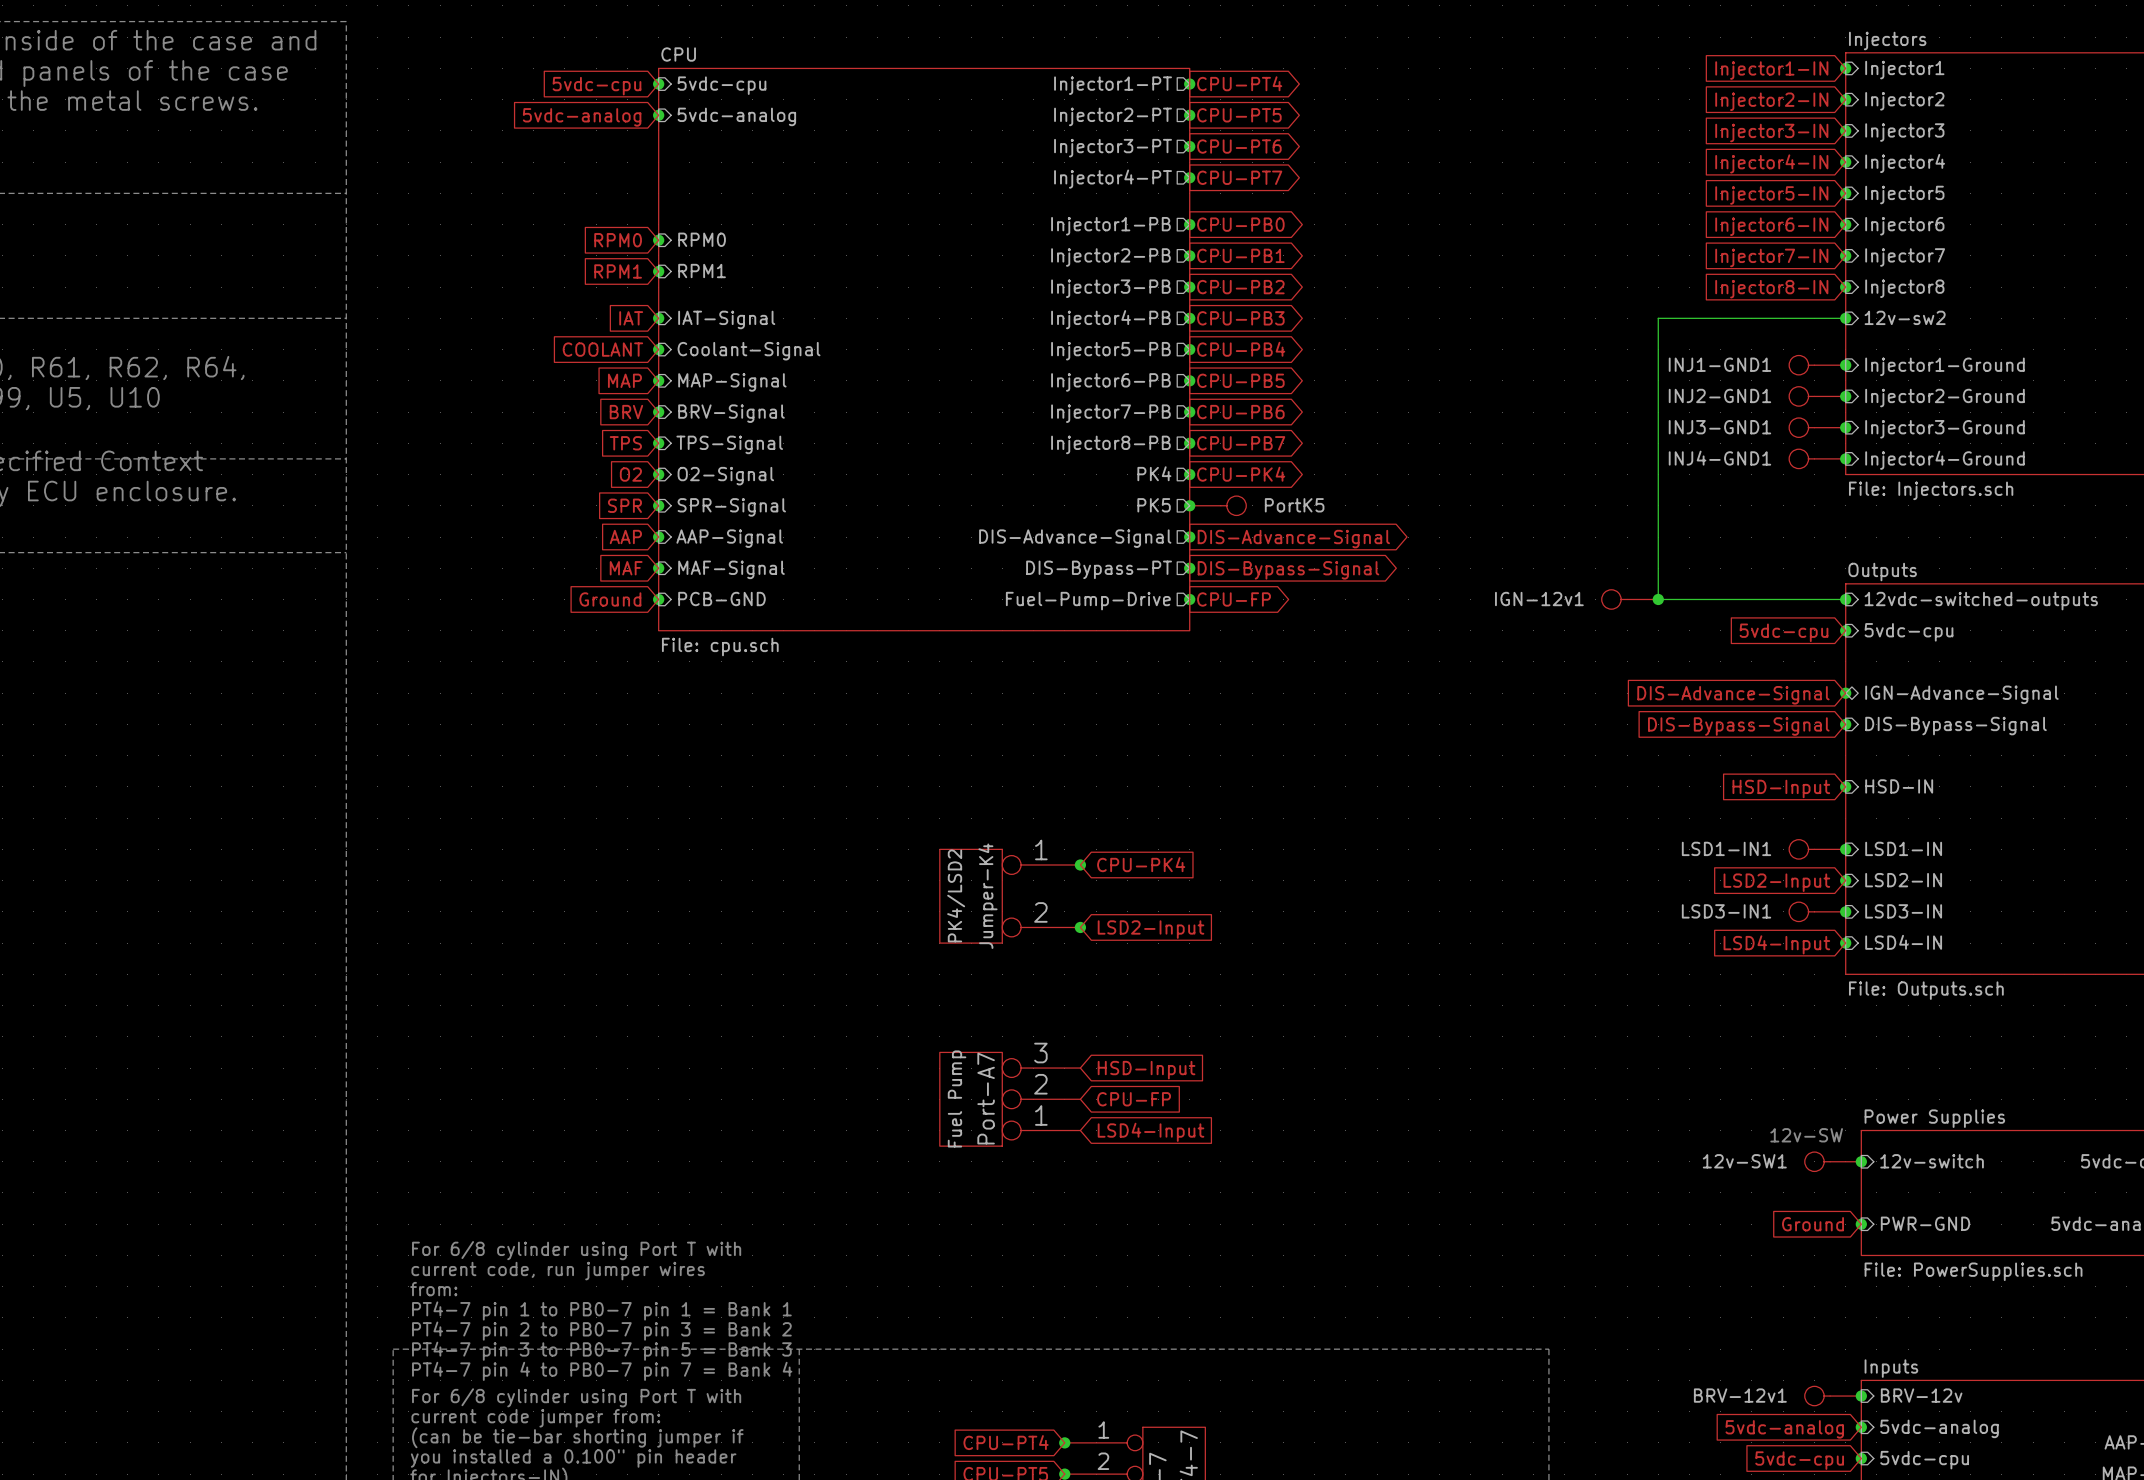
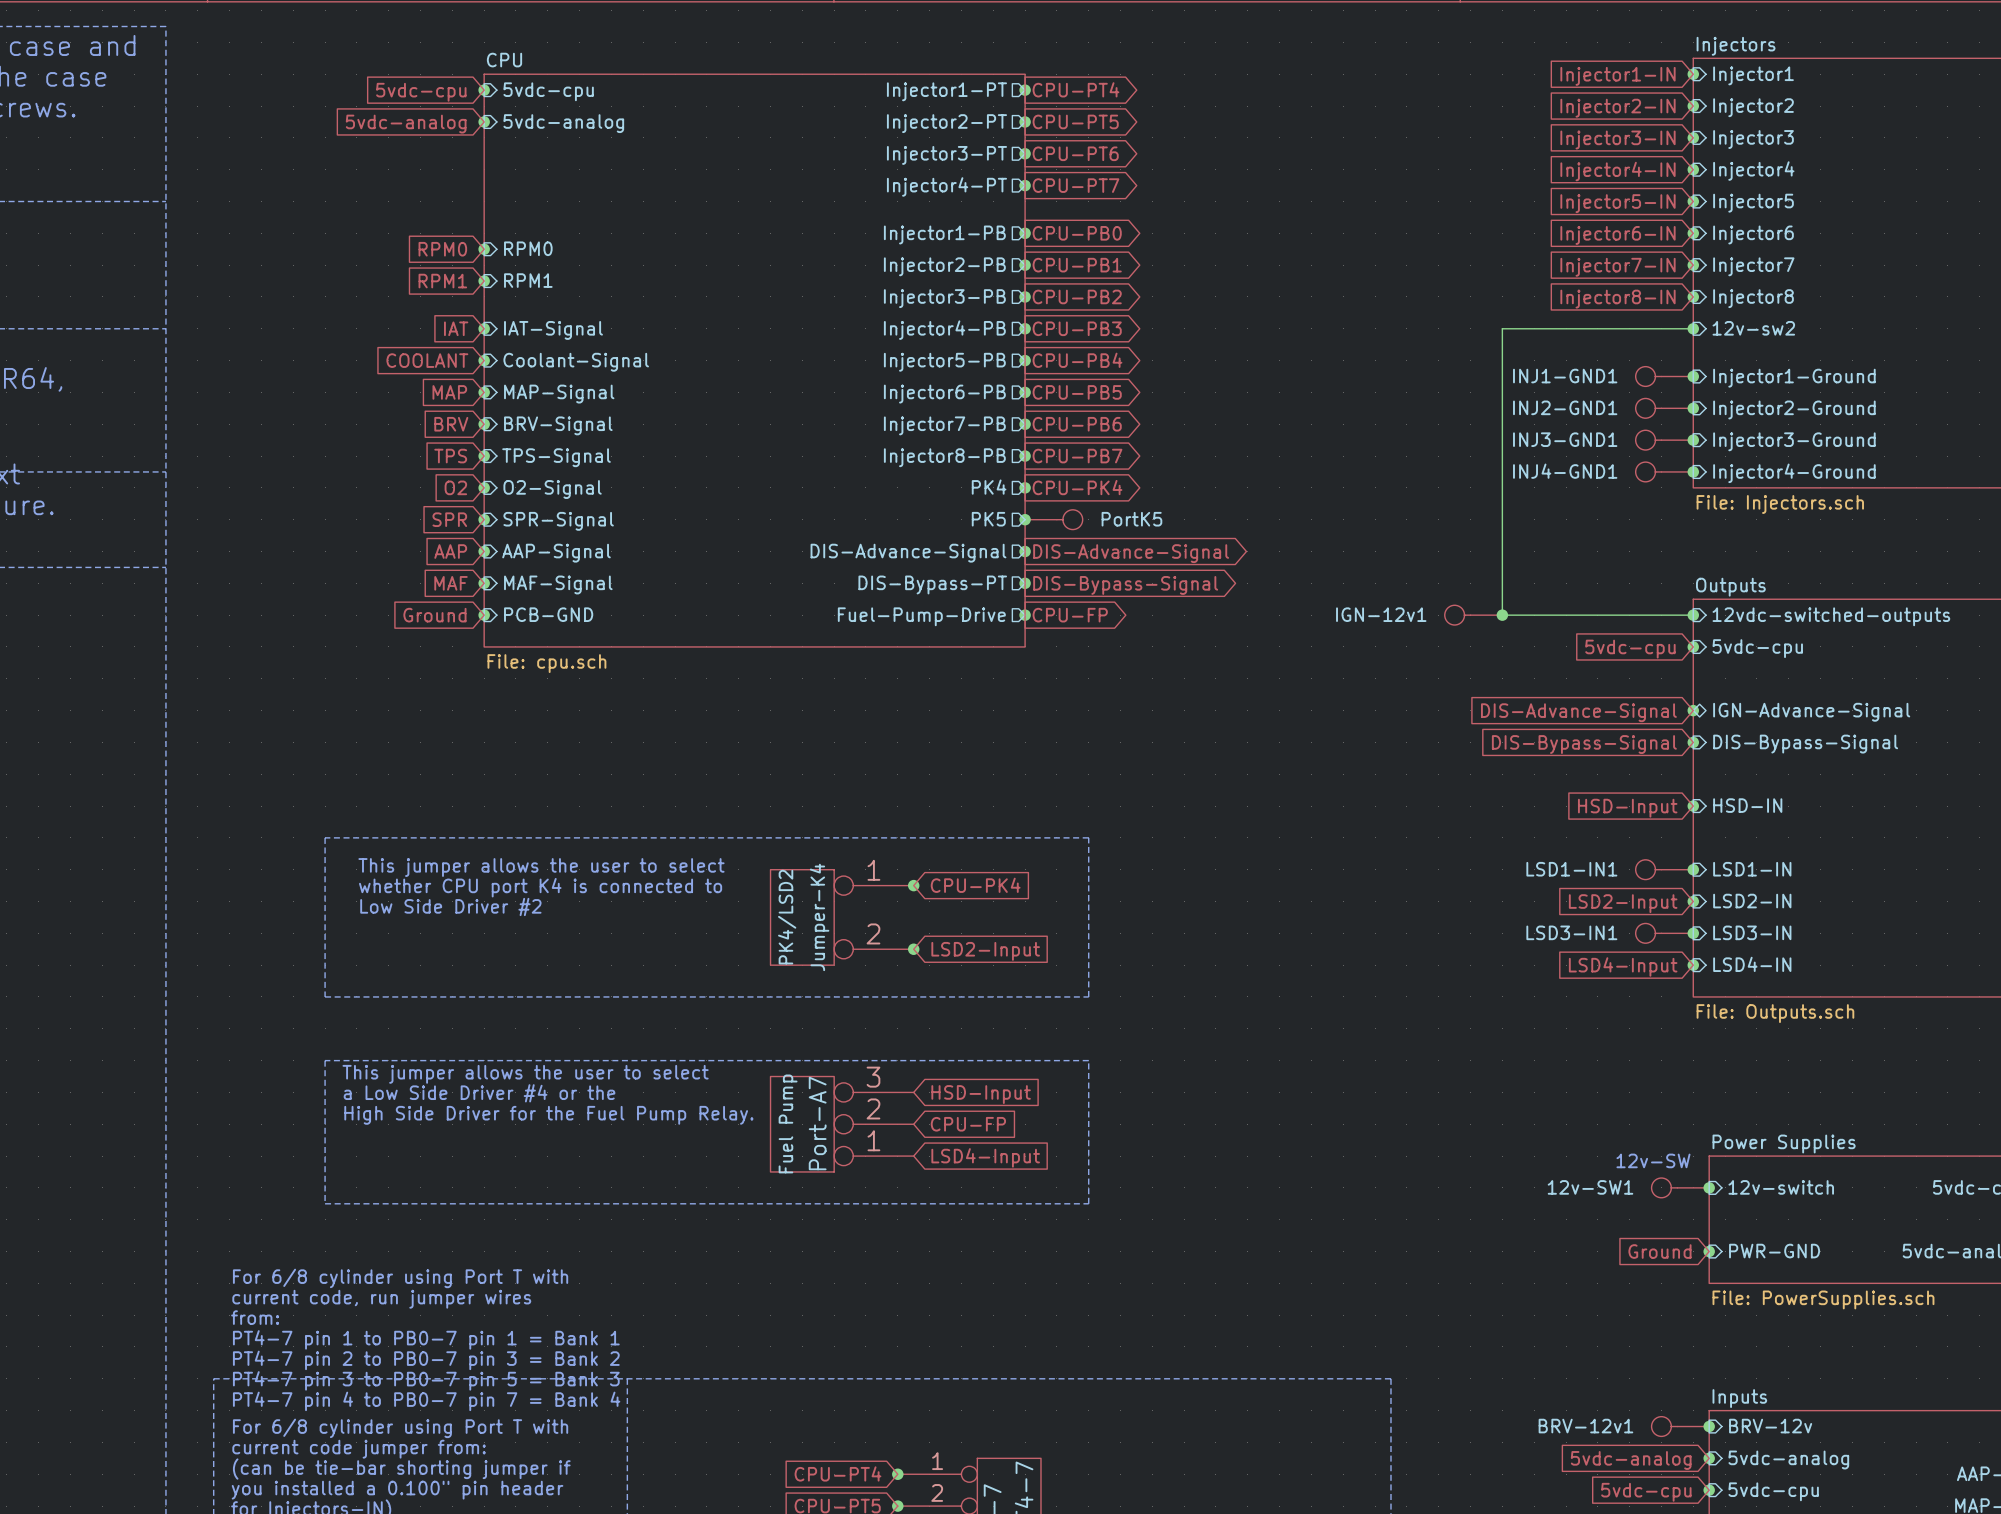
line: none -> (325, 837) (325, 996) (1088, 996) (1088, 837) (325, 837)
text: none -> This jumper allows the user to select (541, 867)
text: none -> whether CPU port K4 is connected to (540, 887)
text: none -> Low Side Driver #2 (450, 906)
line: none -> (325, 1060) (325, 1203) (1088, 1203) (1088, 1060) (325, 1060)
text: none -> This jumper allows the user to select (525, 1074)
text: none -> a Low Side Driver #4 or the (479, 1093)
text: none -> High Side Driver for the Fuel Pump Relay. (548, 1115)

